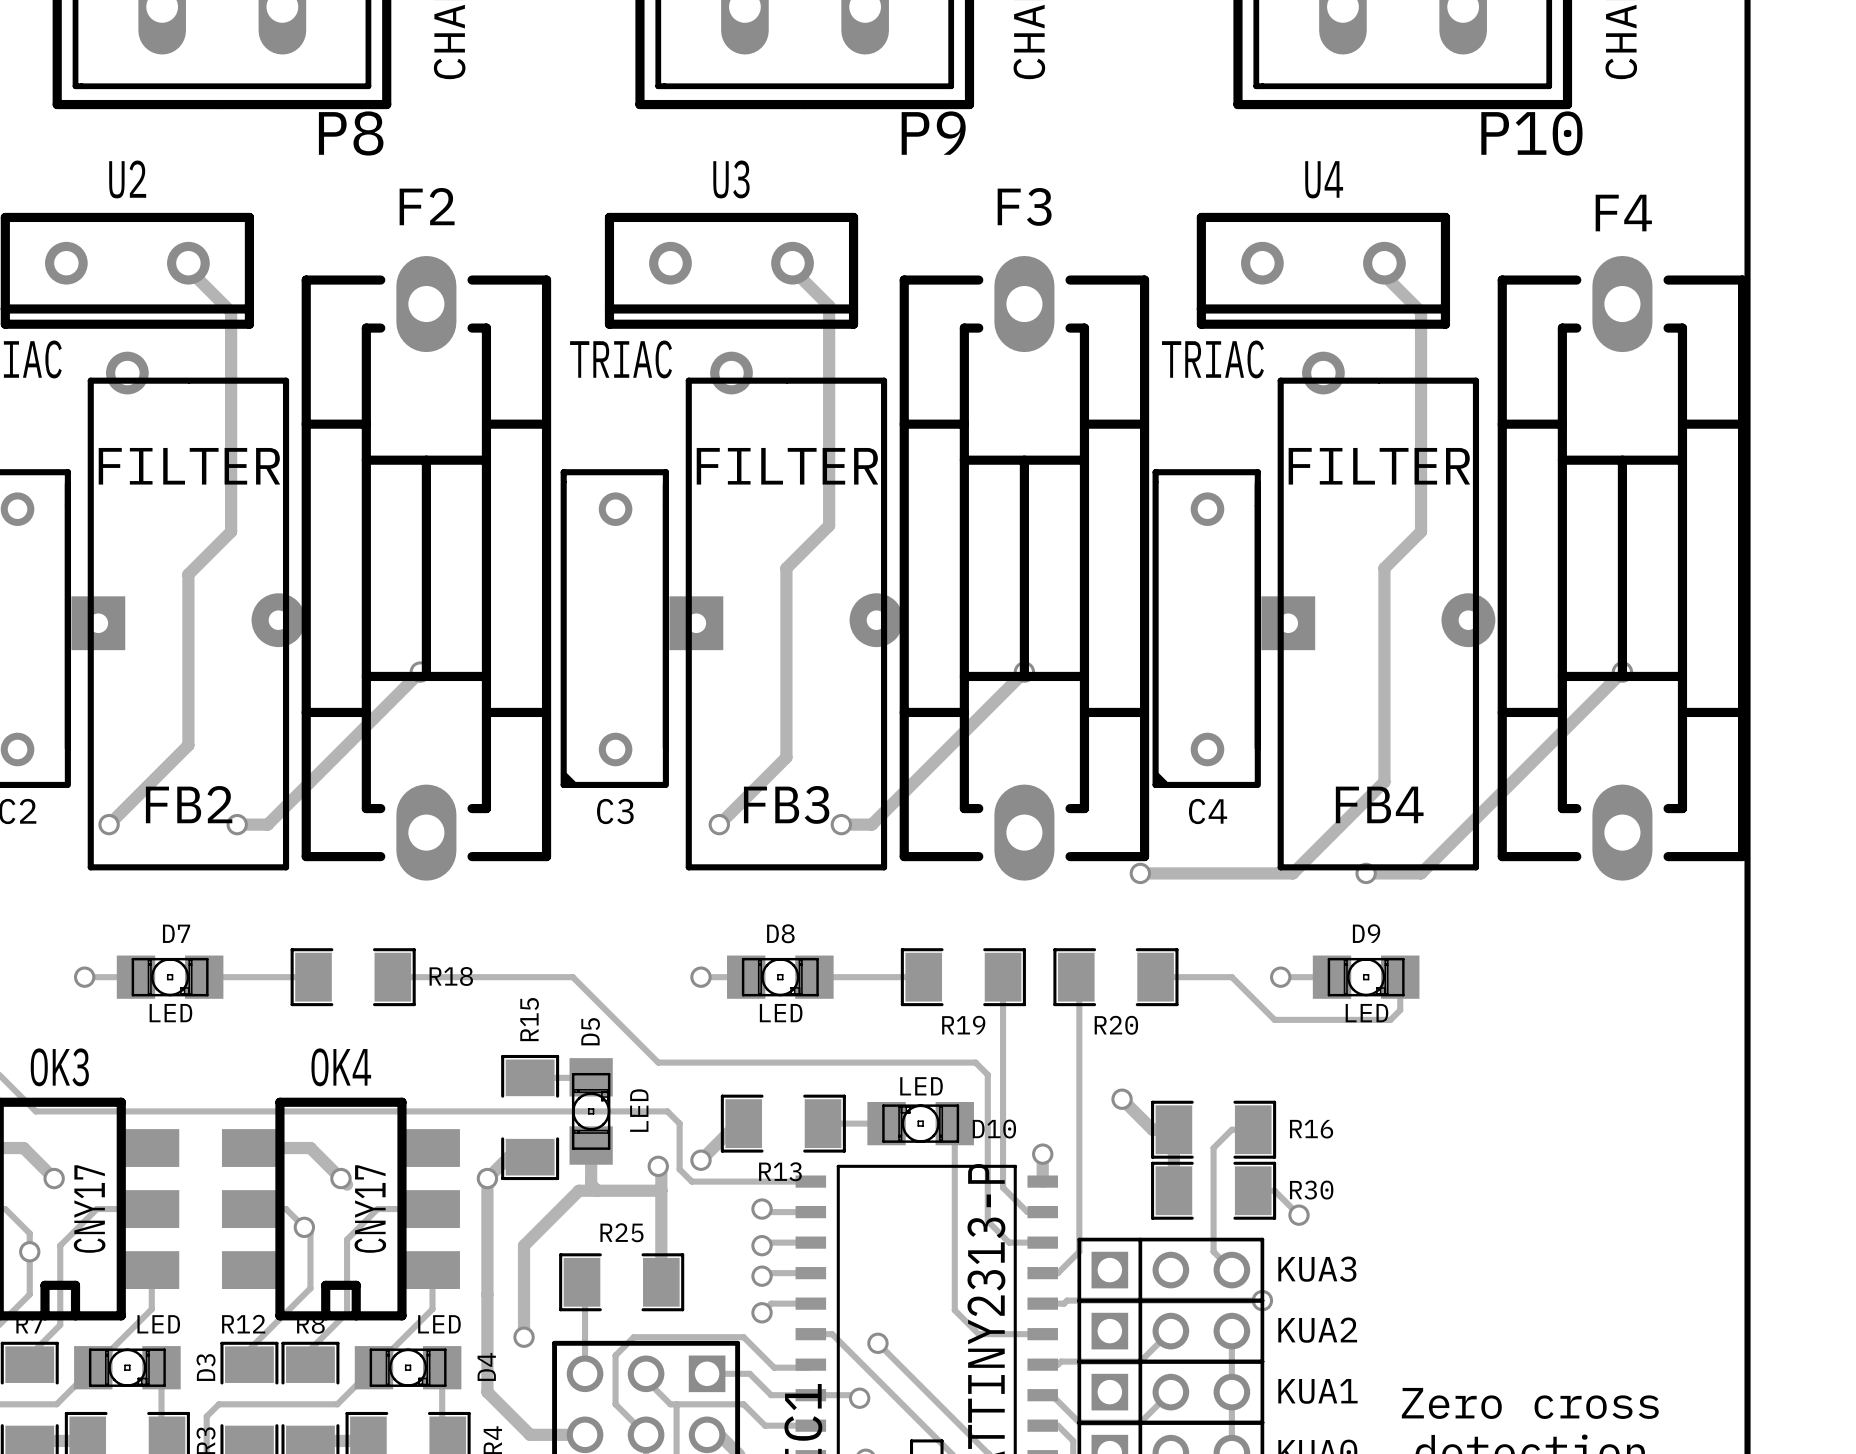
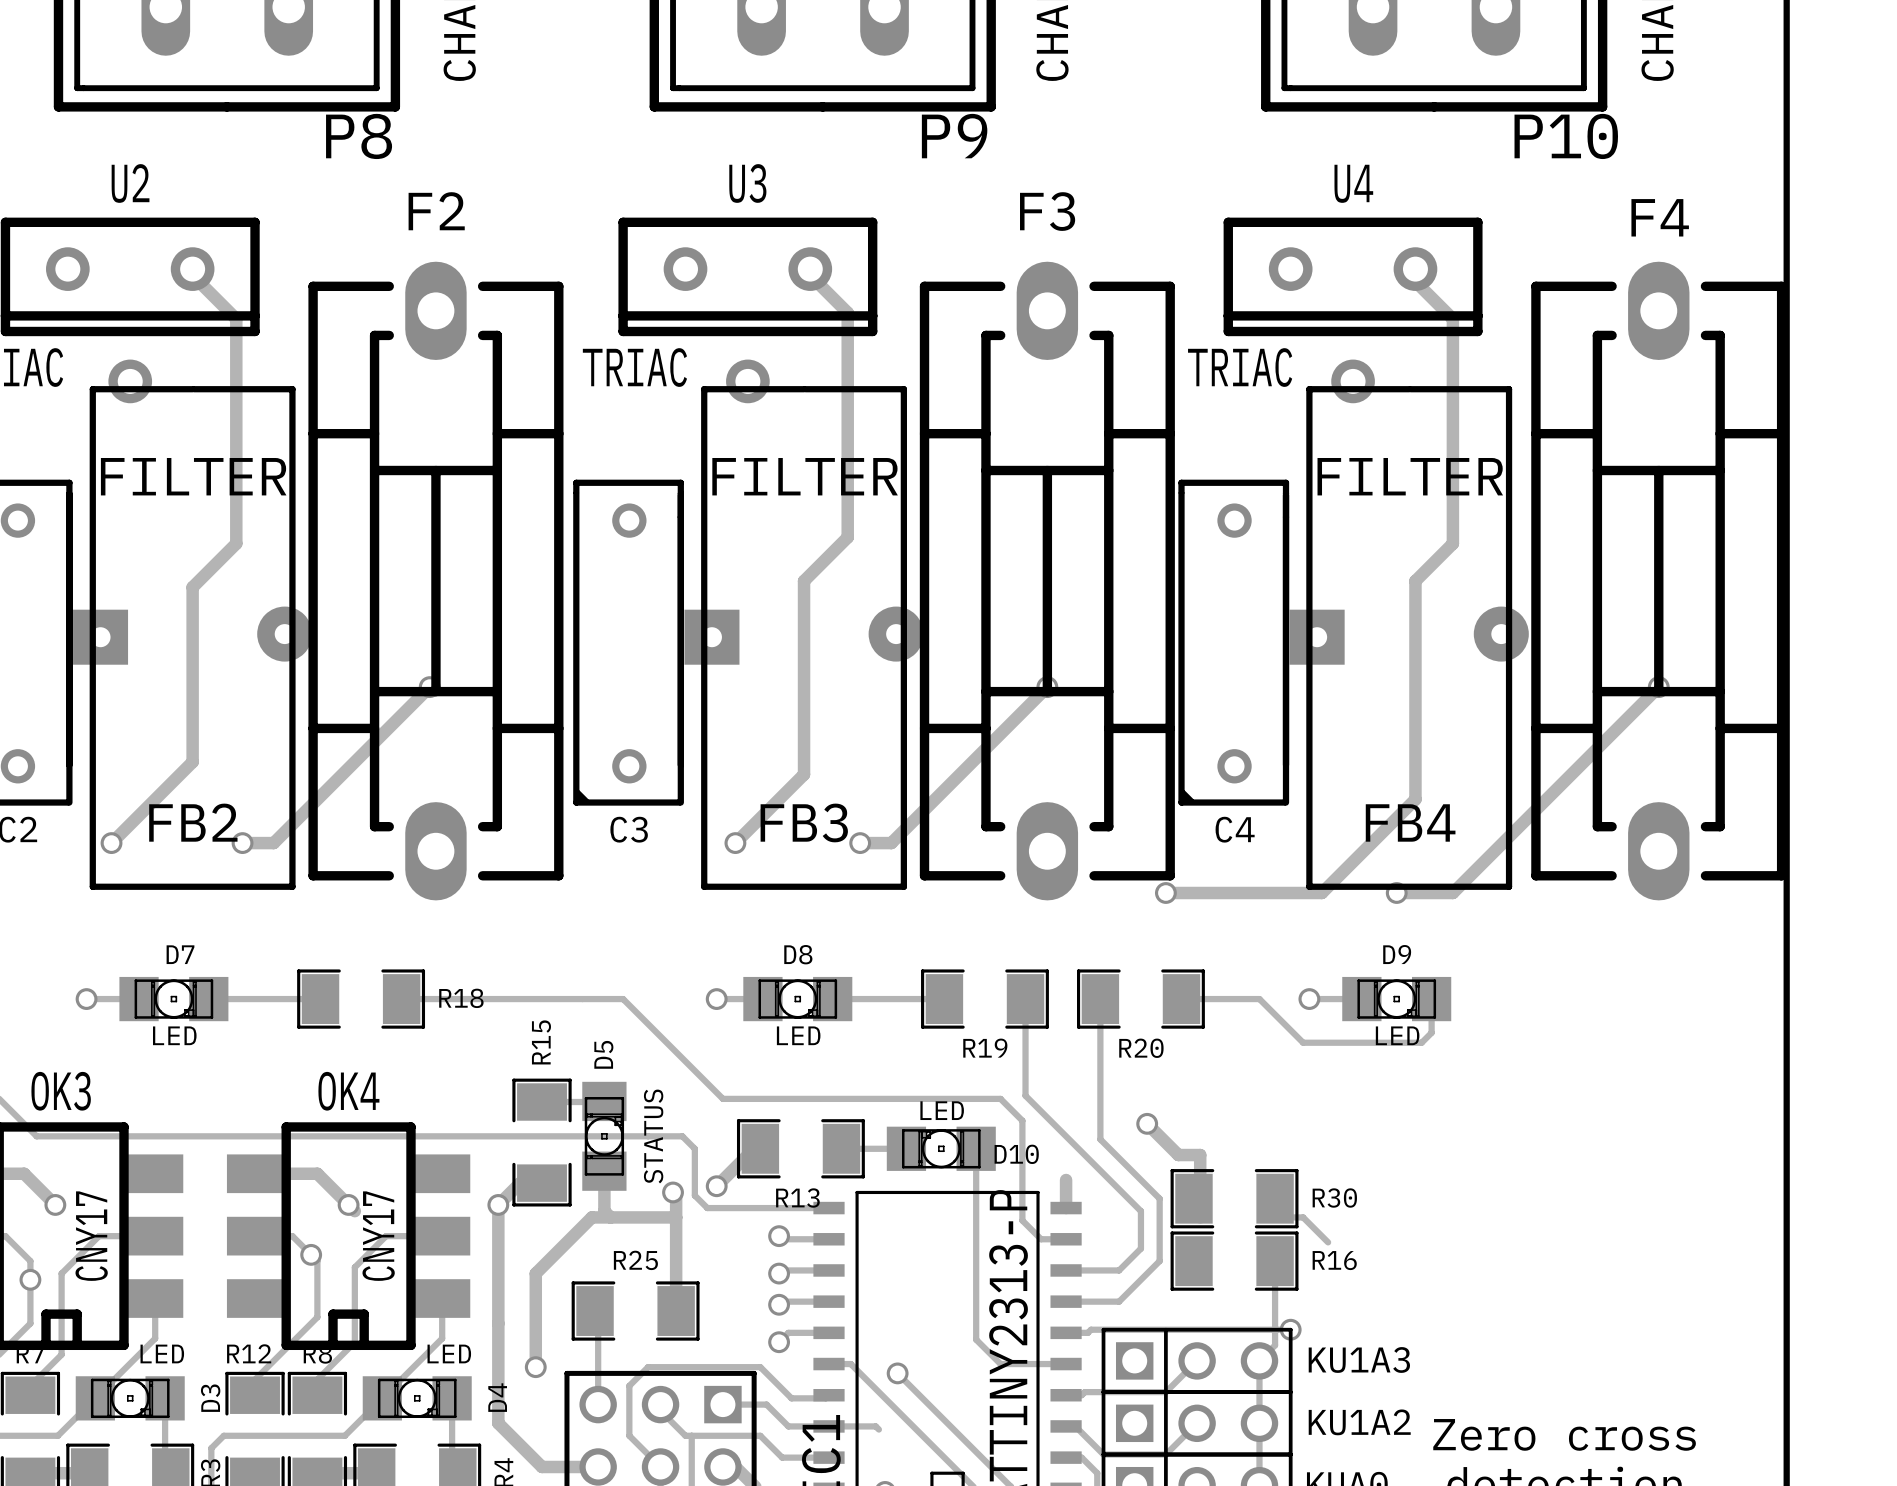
track: (572, 977) (658, 1062) (975, 1062) (987, 1074) (987, 1221) (1009, 1242) (1042, 1242) -> (585, 999) (623, 999) (722, 1098) (1000, 1098) (1022, 1120) (1022, 1220) (1041, 1239) (1050, 1239)
track: (1076, 977) (1079, 980) (1079, 1251) (1057, 1273) -> (1100, 999) (1100, 1139) (1159, 1198) (1159, 1261) (1119, 1301) (1081, 1301)
track: (1003, 1071) (1003, 1187) (1027, 1212) -> (1025, 1095) (1140, 1211) (1140, 1248) (1119, 1270) (1066, 1270)
D5 value: LED (639, 1110) -> STATUS (653, 1136)
R16 position: (1213, 1129) -> (1234, 1261)
track: (1253, 1129) (1231, 1129) (1213, 1148) (1213, 1251) (1231, 1270) -> none
via: (1042, 1154) -> none
R30 position: (1213, 1190) -> (1234, 1198)
via: (1299, 1215) -> none
track: none -> (1275, 1261) (1275, 1345) (1259, 1360)
KUA3: (1170, 1270) -> none
KUA2 name: KUA2 (1317, 1330) -> KU1A3 (1359, 1359)
KUA1 name: KUA1 (1317, 1391) -> KU1A2 (1359, 1422)
via: (859, 1398) -> none

